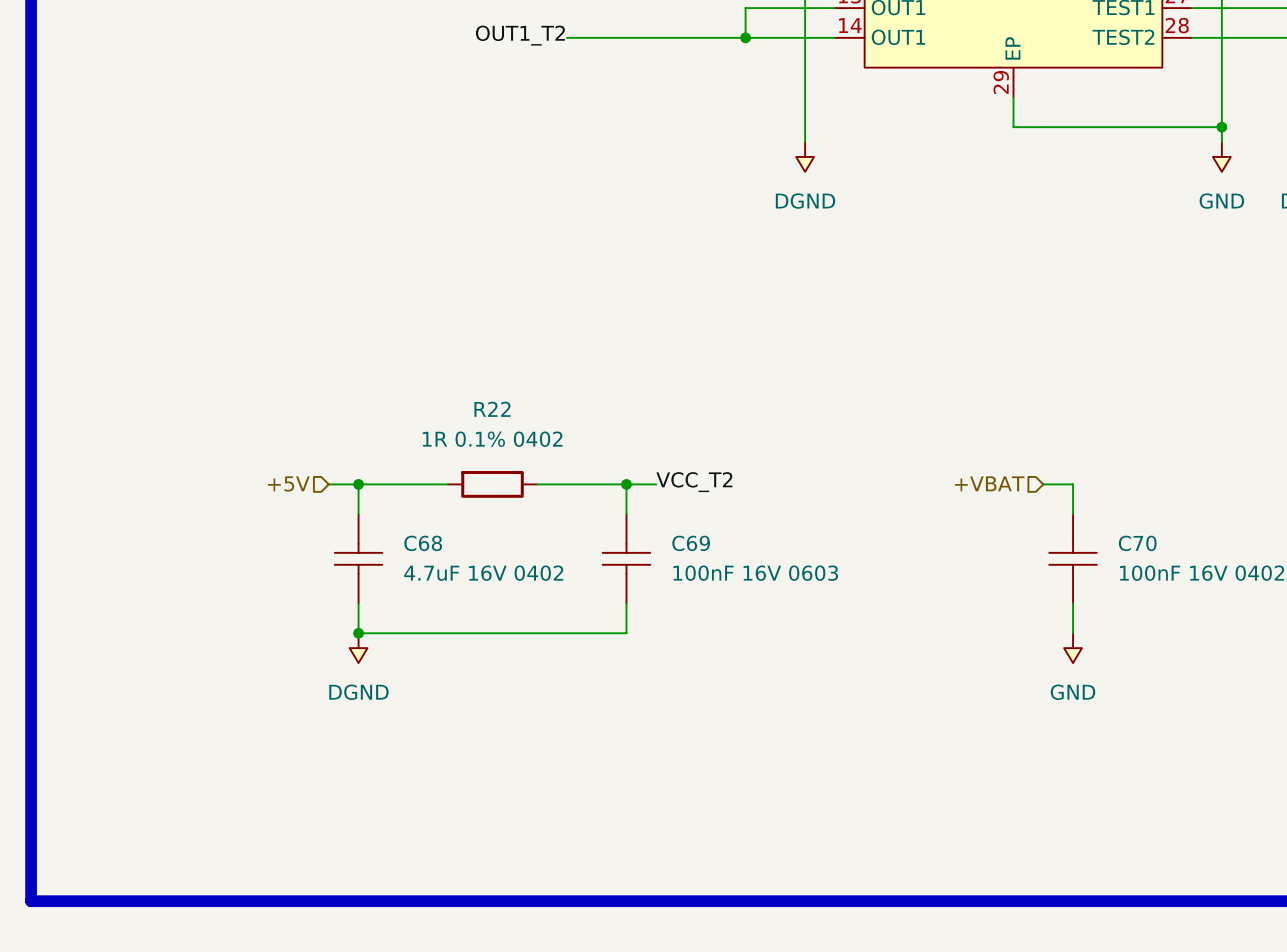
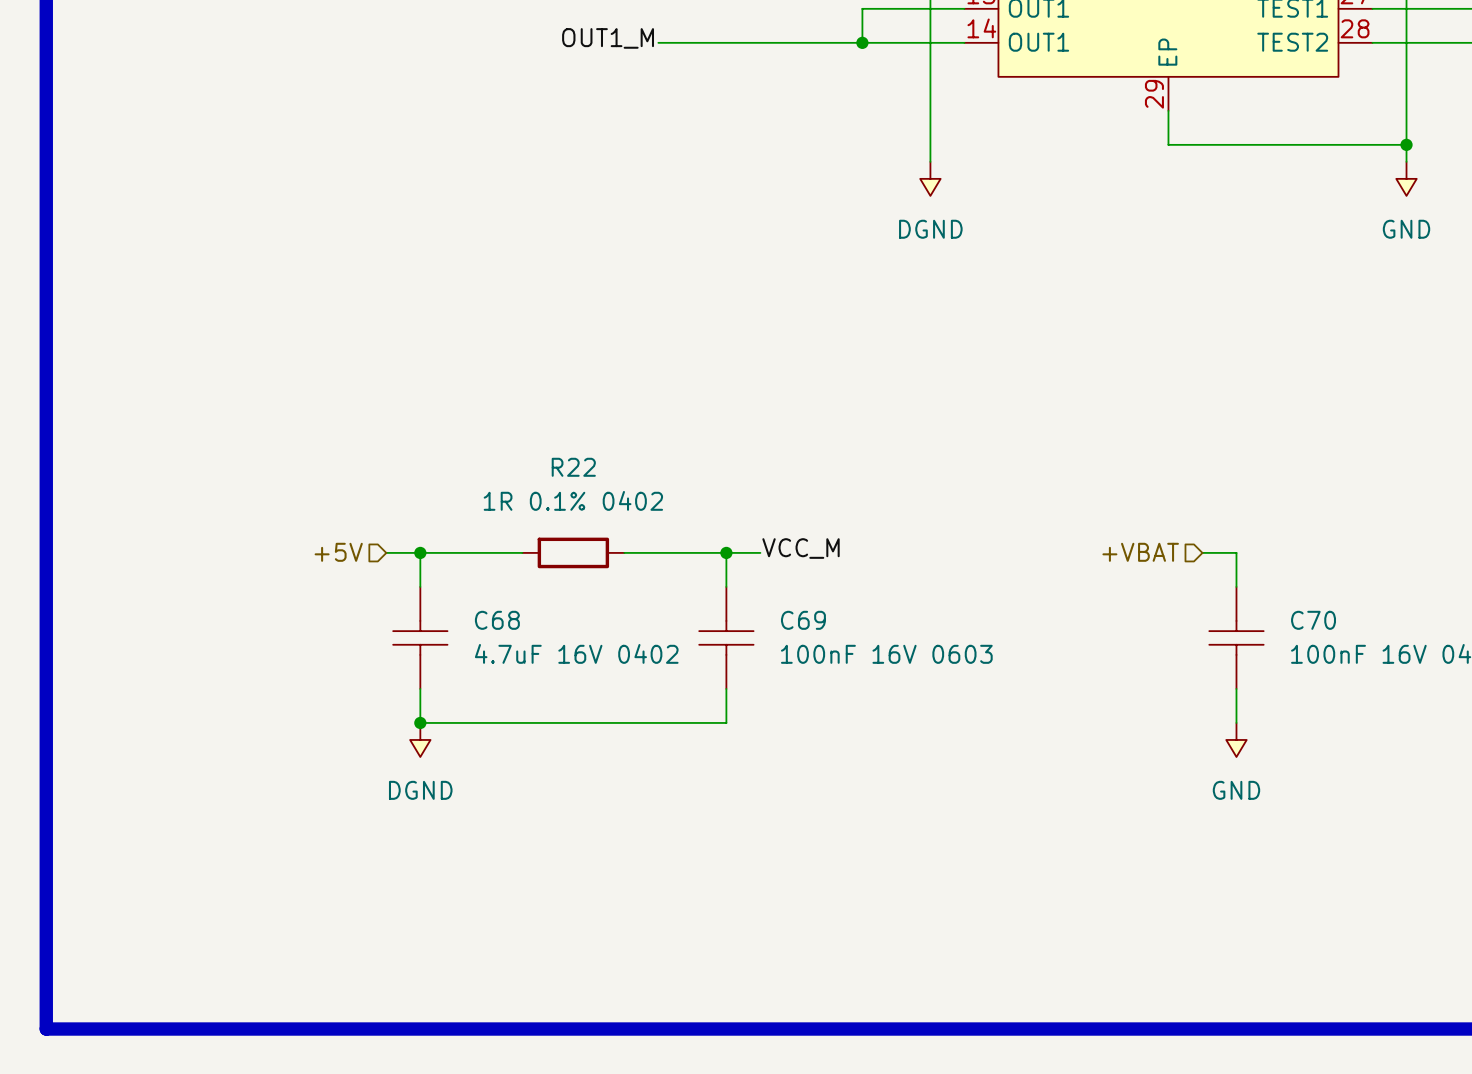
label: OUT1_T2 (520, 35) -> OUT1_M (608, 38)
label: VCC_T2 (694, 482) -> VCC_M (801, 548)

